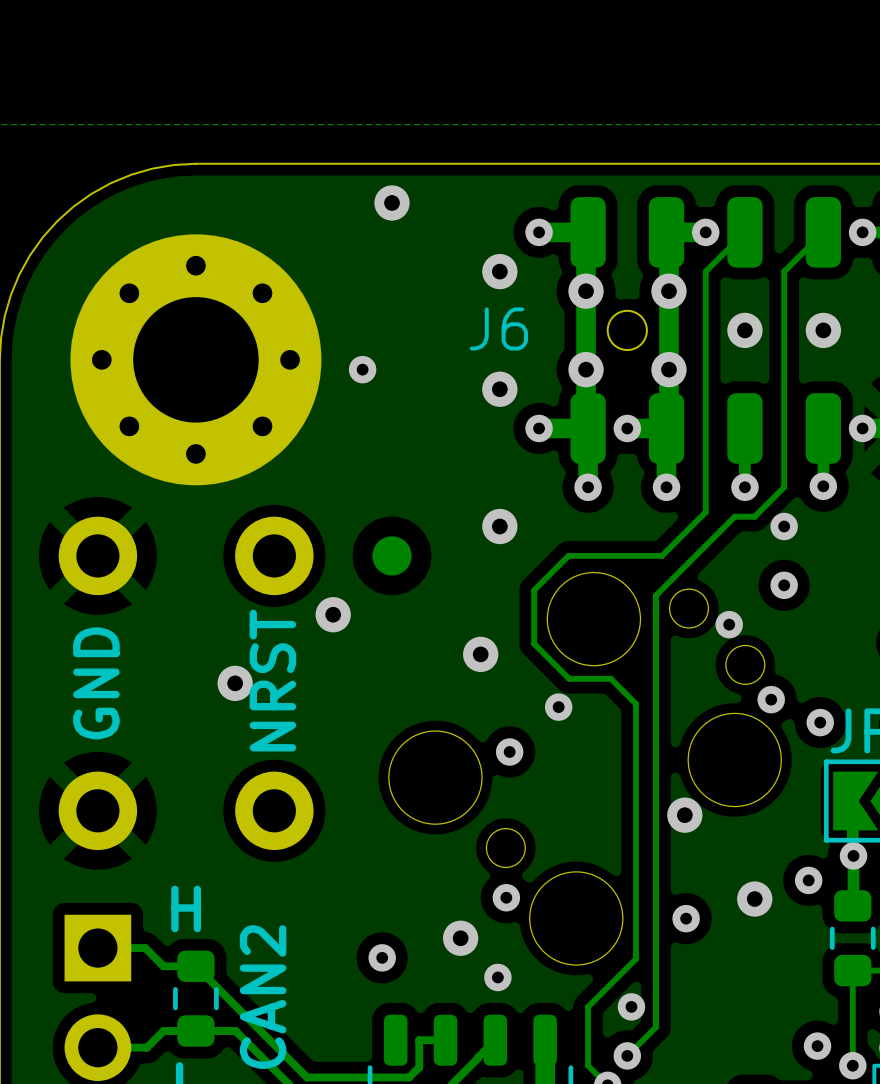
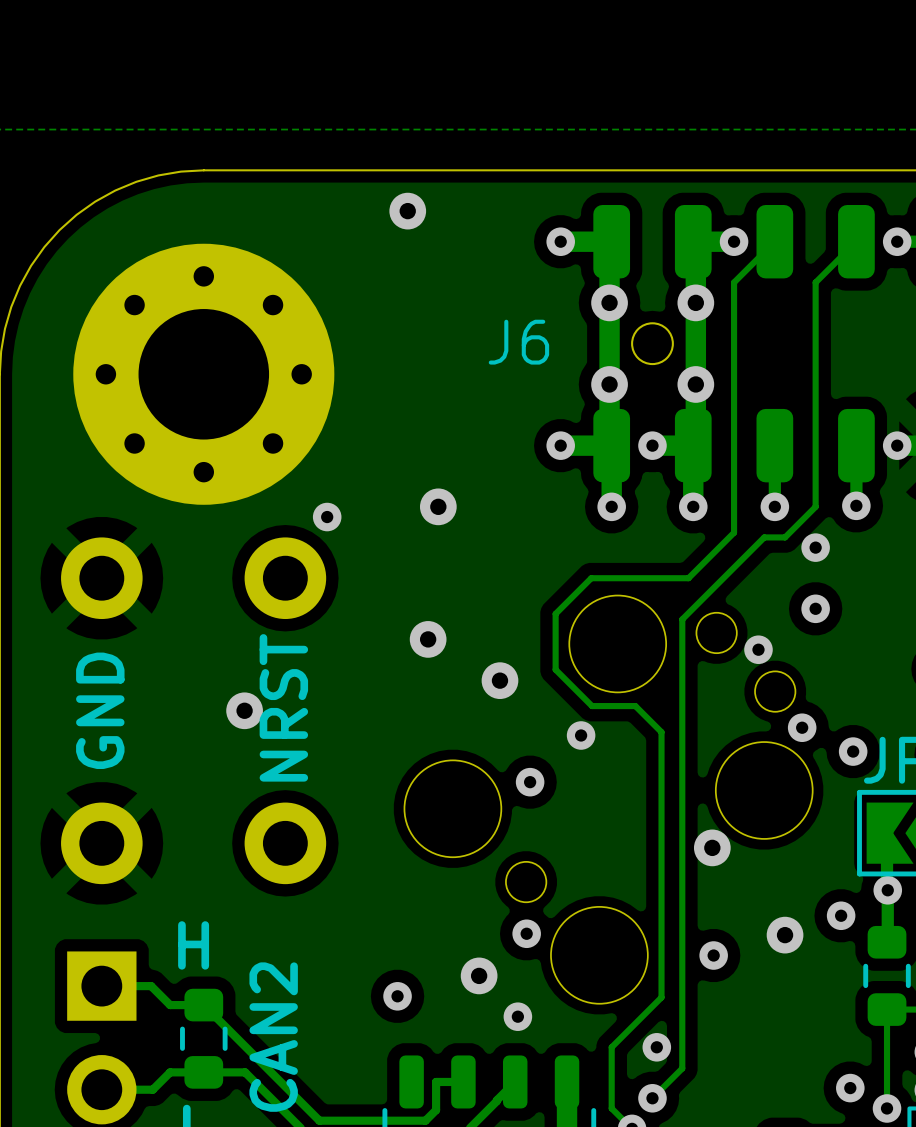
via: (499, 271) -> none
via: (744, 330) -> none
via: (823, 330) -> none
via position: (362, 369) -> (327, 517)
via: (499, 389) -> none
via: none -> (438, 506)
via: (499, 526) -> none
part: (392, 555) -> none
via: (333, 614) -> none
via: none -> (428, 639)

